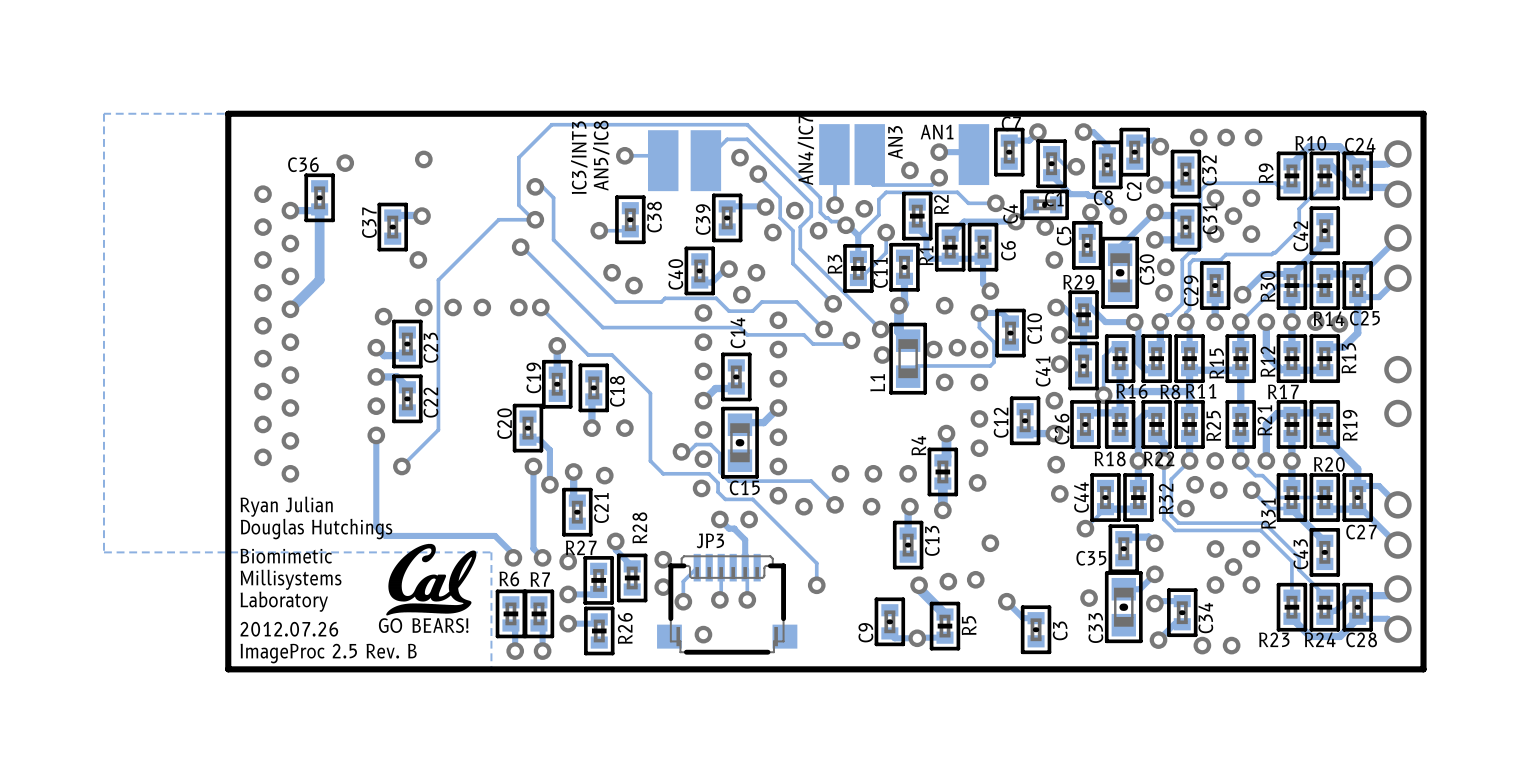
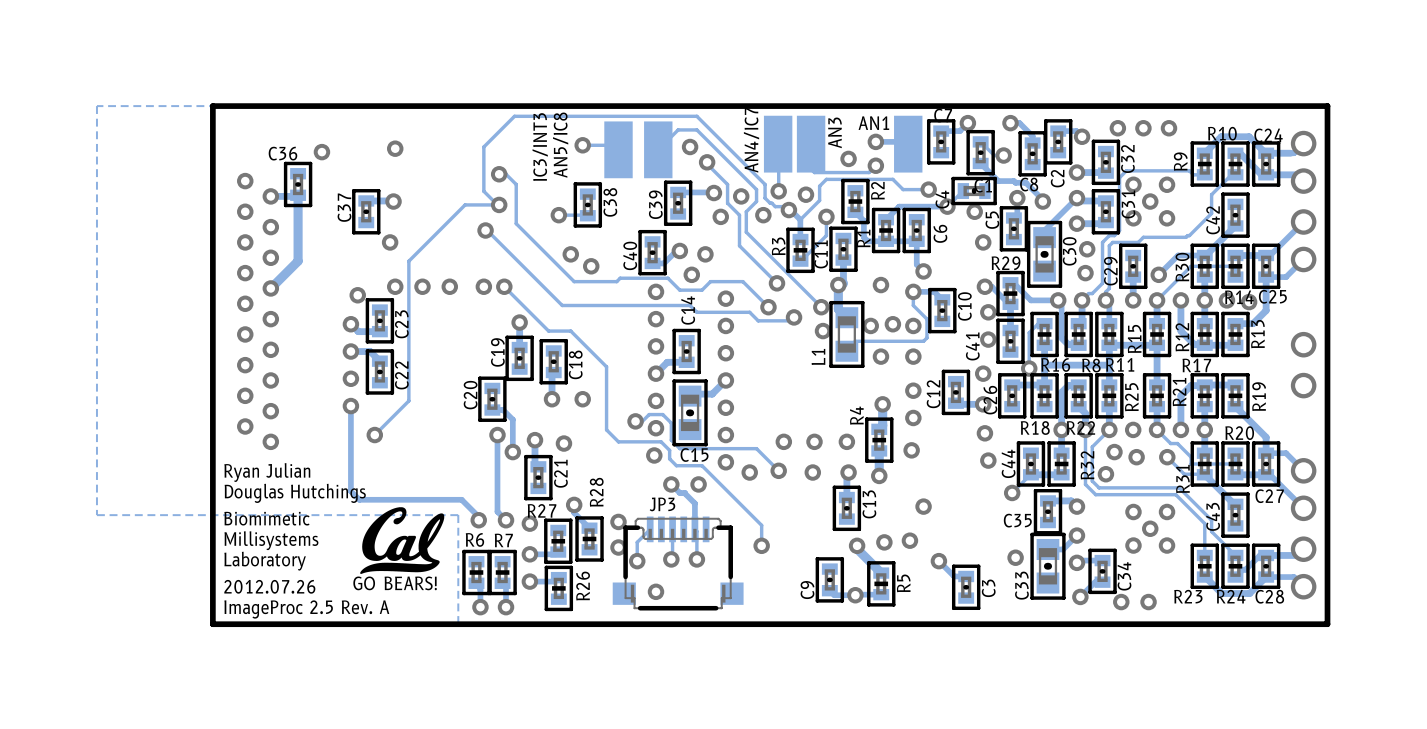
text: ImageProc 2.5 Rev. B (328, 653) -> ImageProc 2.5 Rev. A (306, 609)

